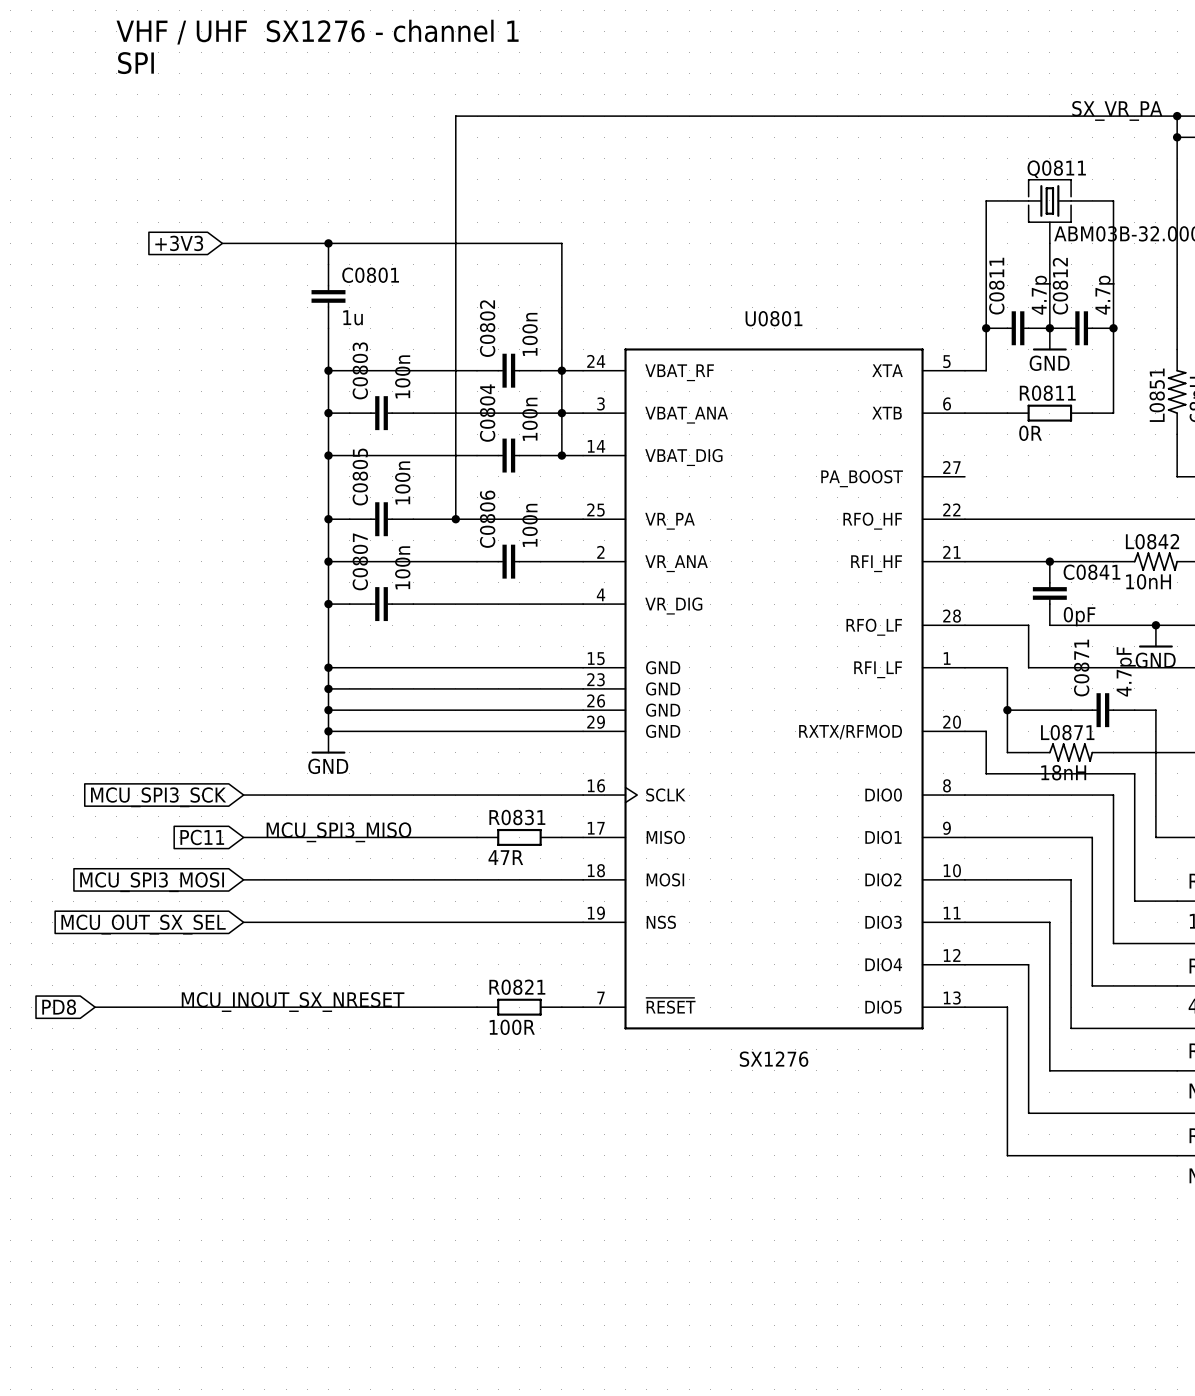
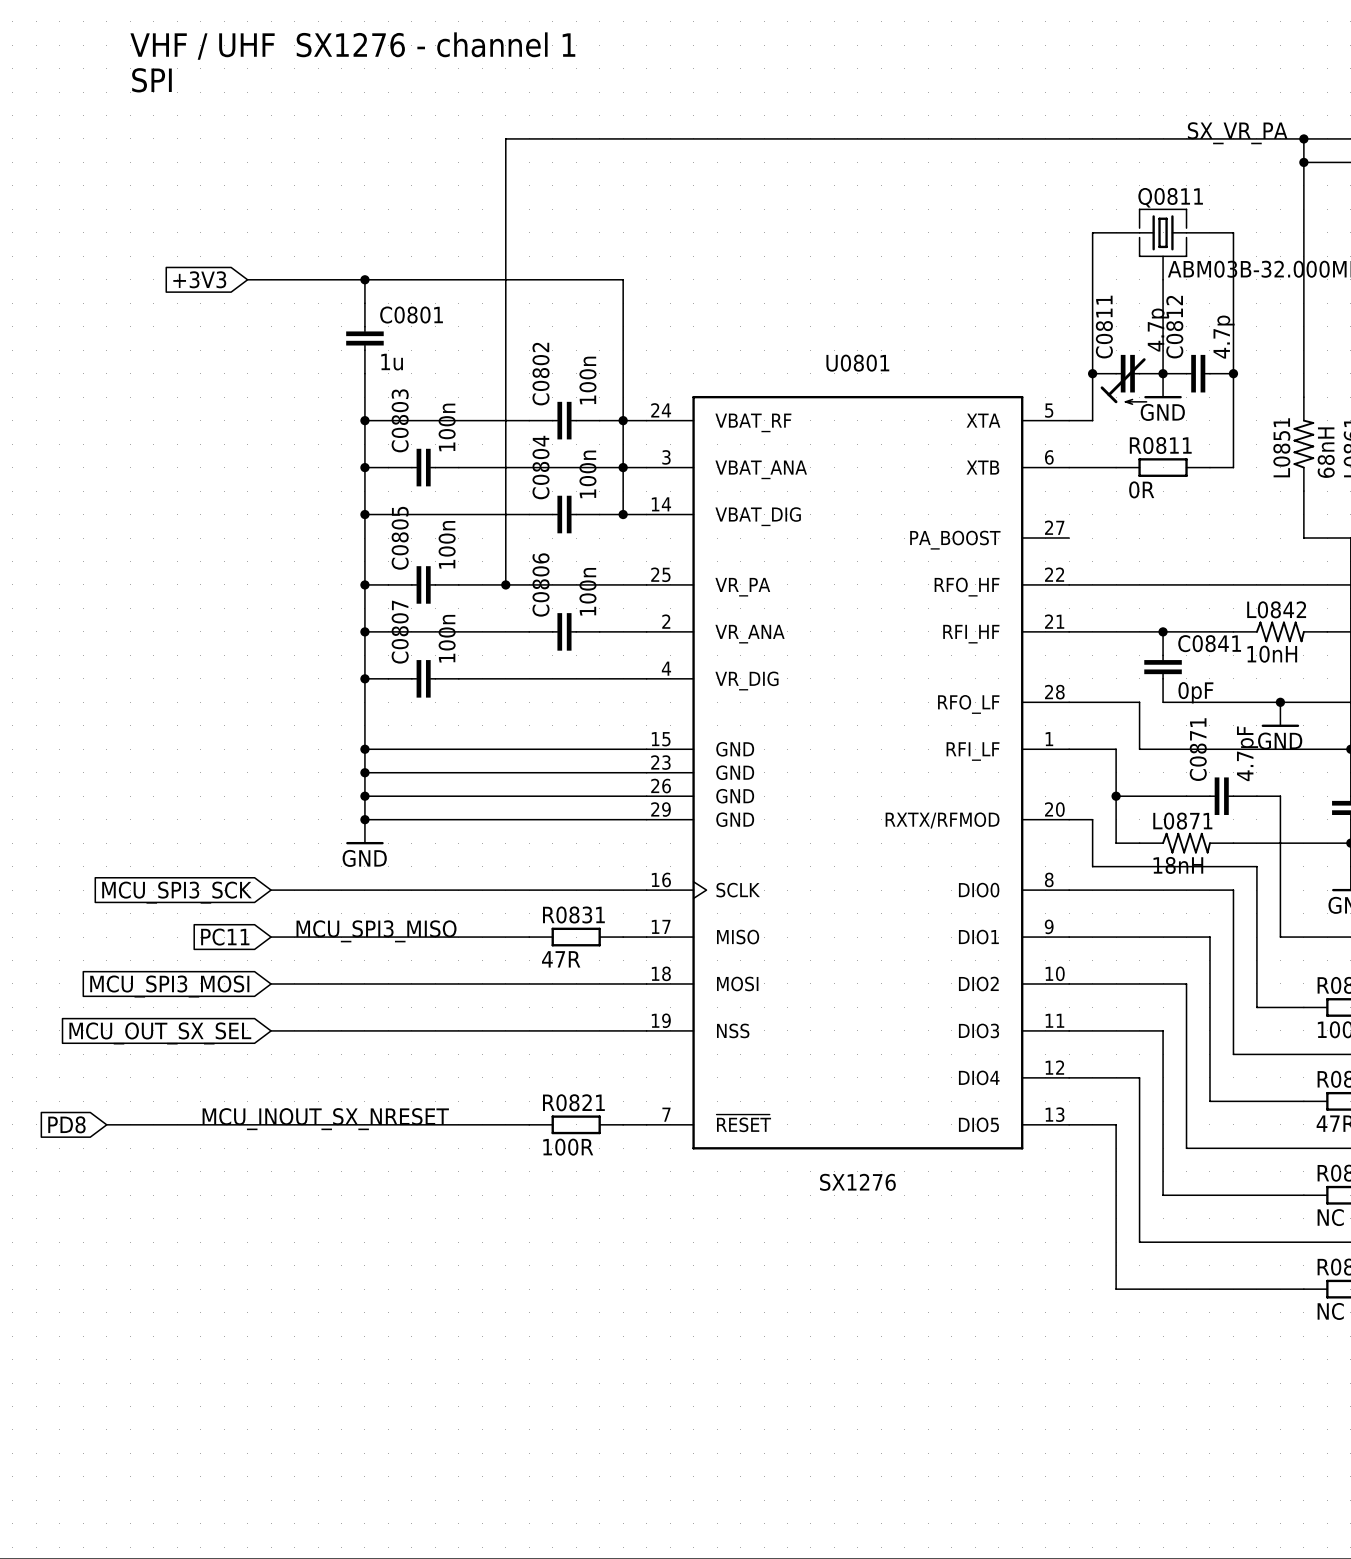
C0811 symbol: [986, 311, 1050, 346] -> [1092, 354, 1164, 405]

